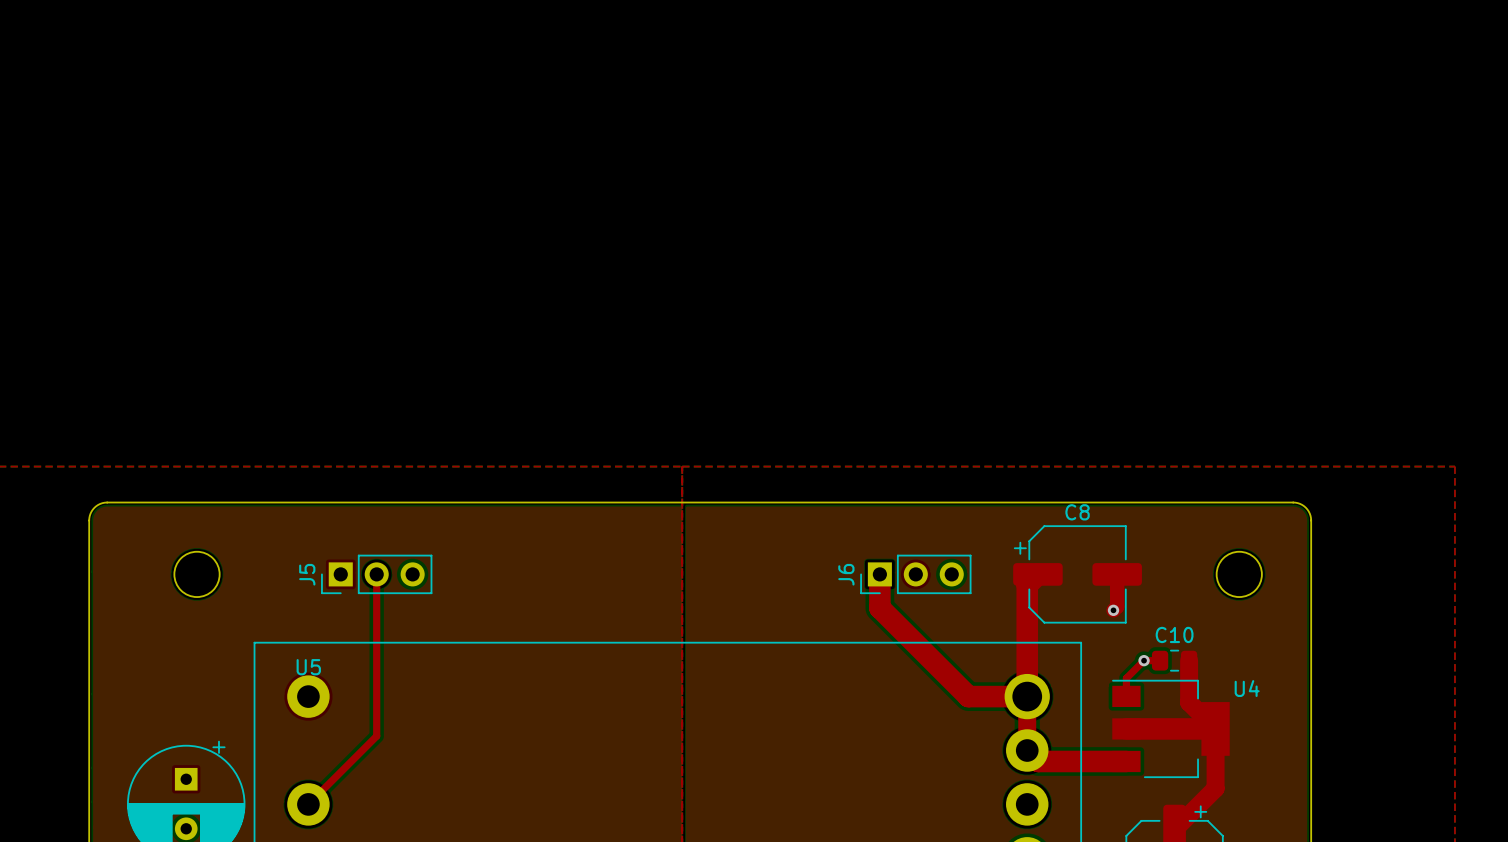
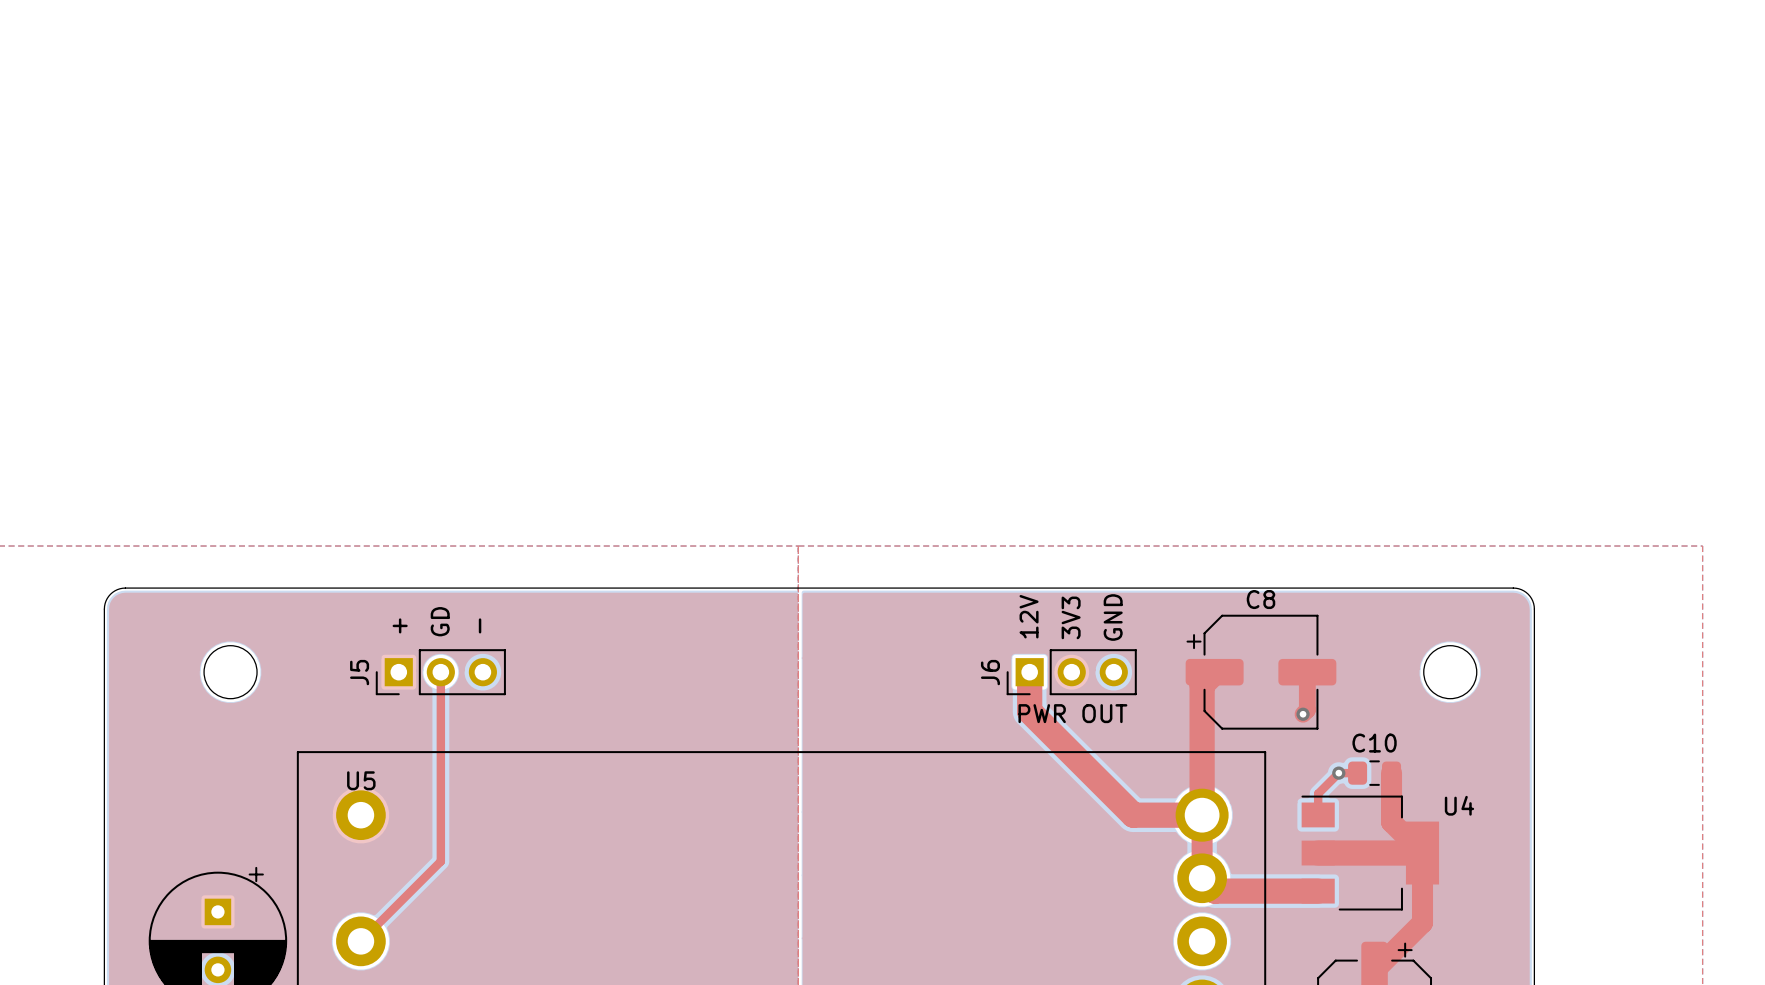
J6 text: none -> 12V (1029, 616)
J6 text: none -> GND (1113, 617)
J6 text: none -> 3V3 (1071, 617)
J5 text: none -> GD (440, 621)
J5 text: none -> + (400, 625)
J5 text: none -> - (480, 625)
J6 value: none -> PWR OUT (1072, 713)

